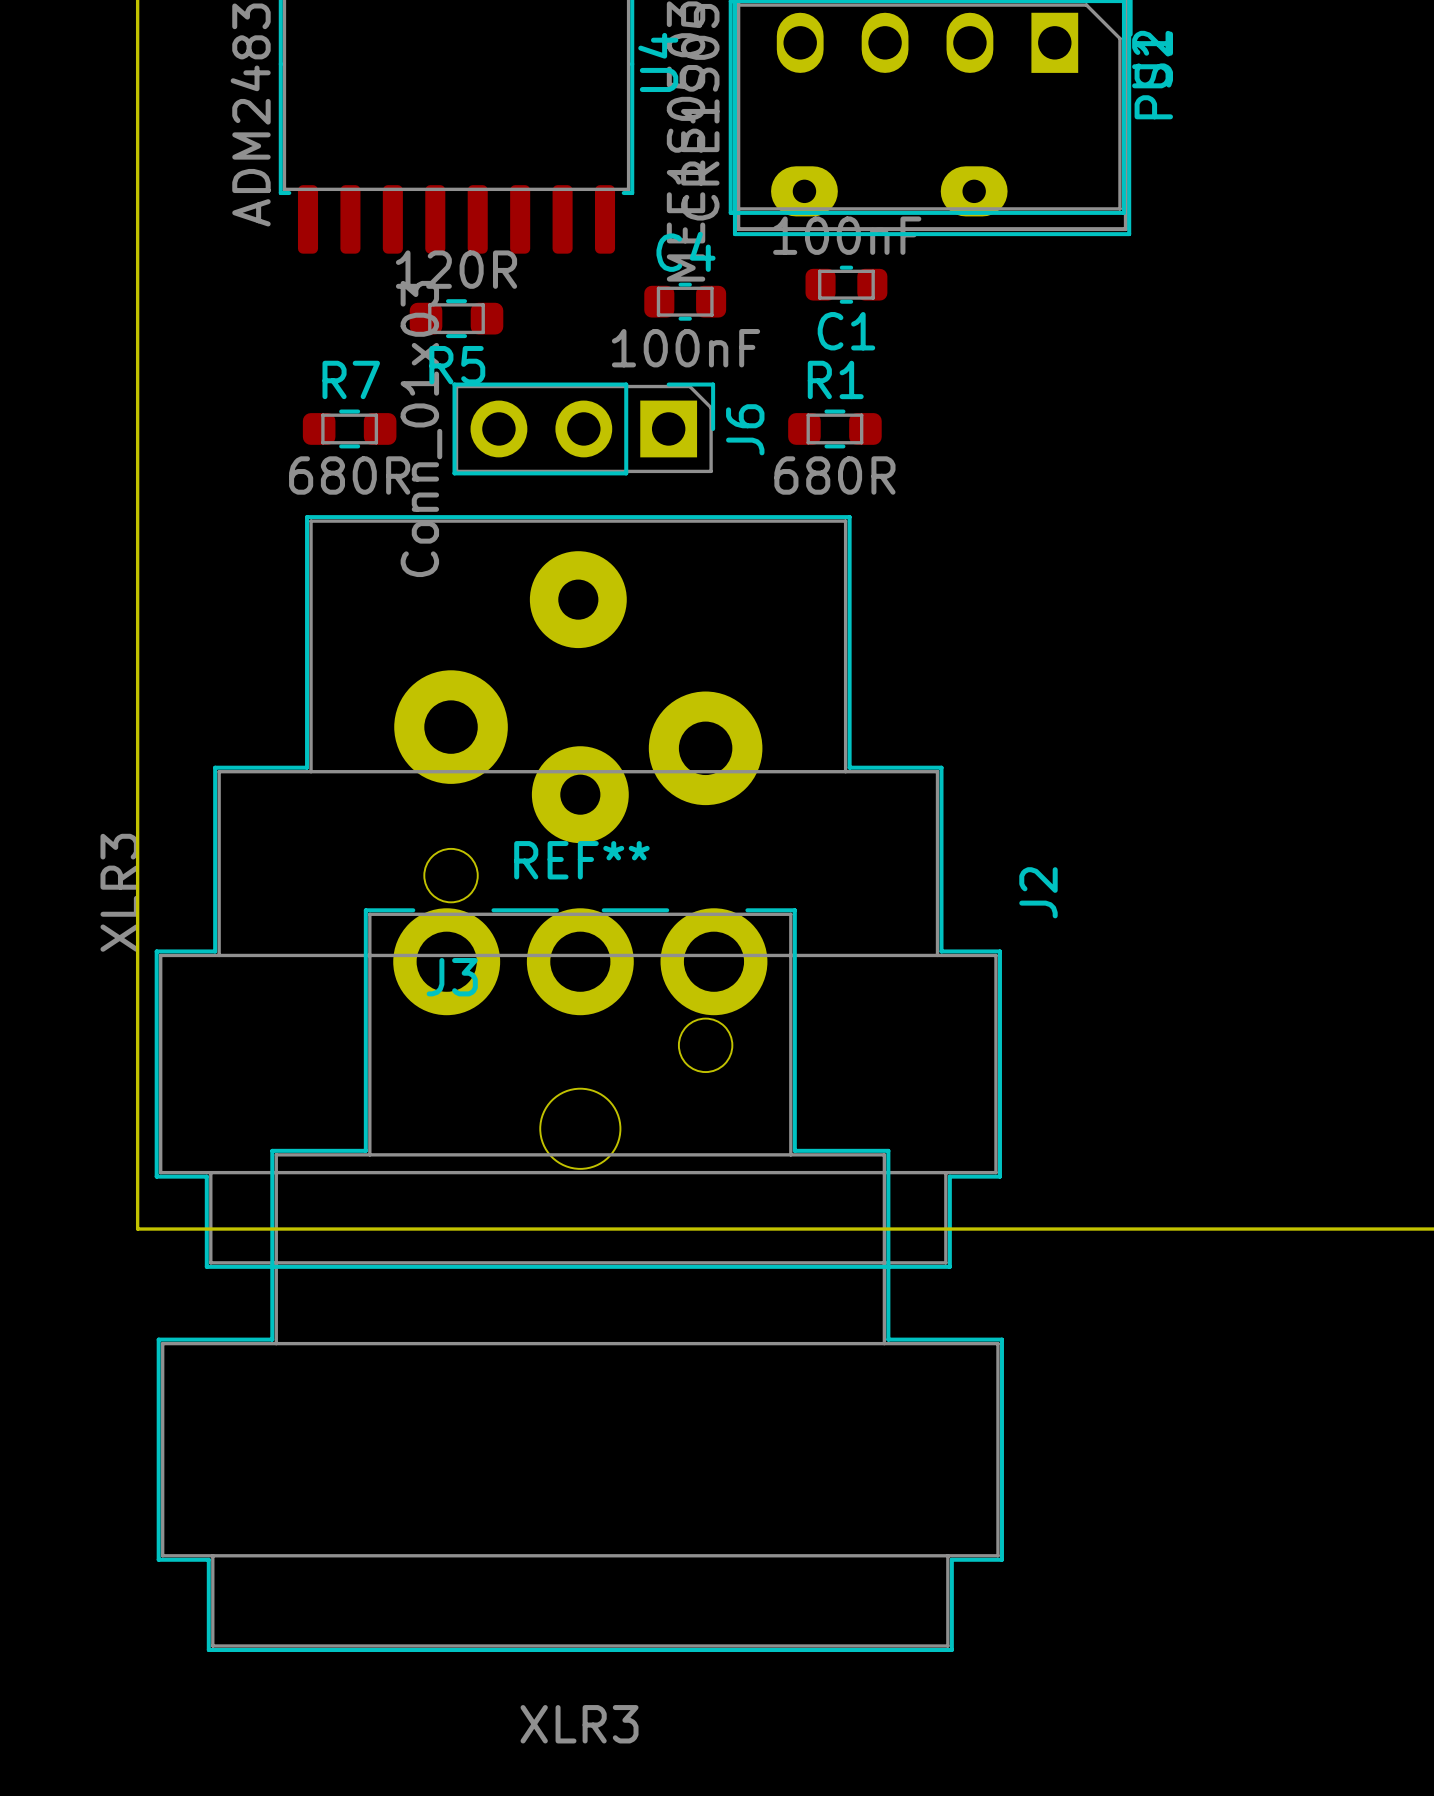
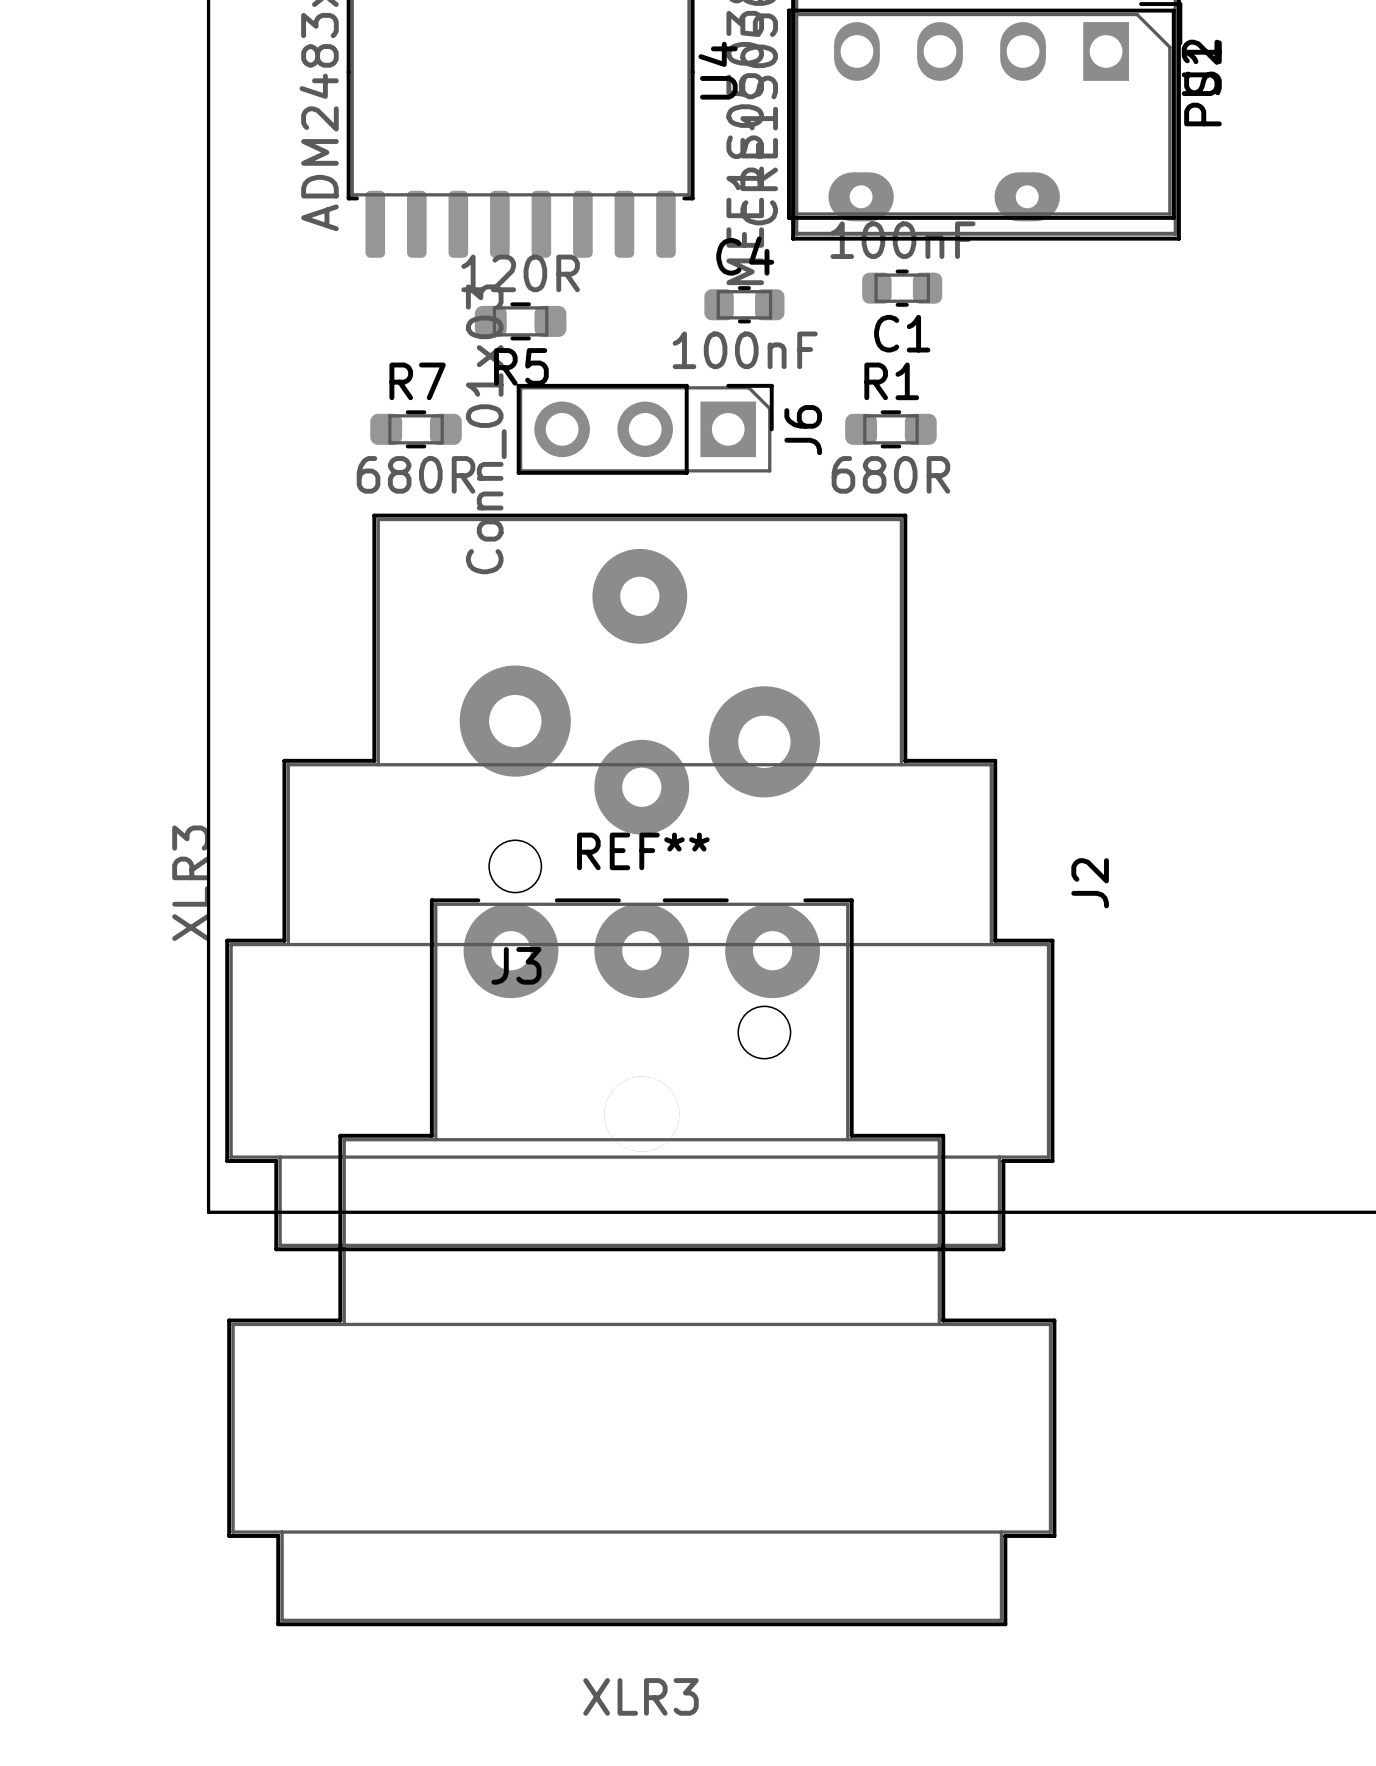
J3 footprint: [156, 746, 1004, 1653] -> [227, 739, 1057, 1627]

